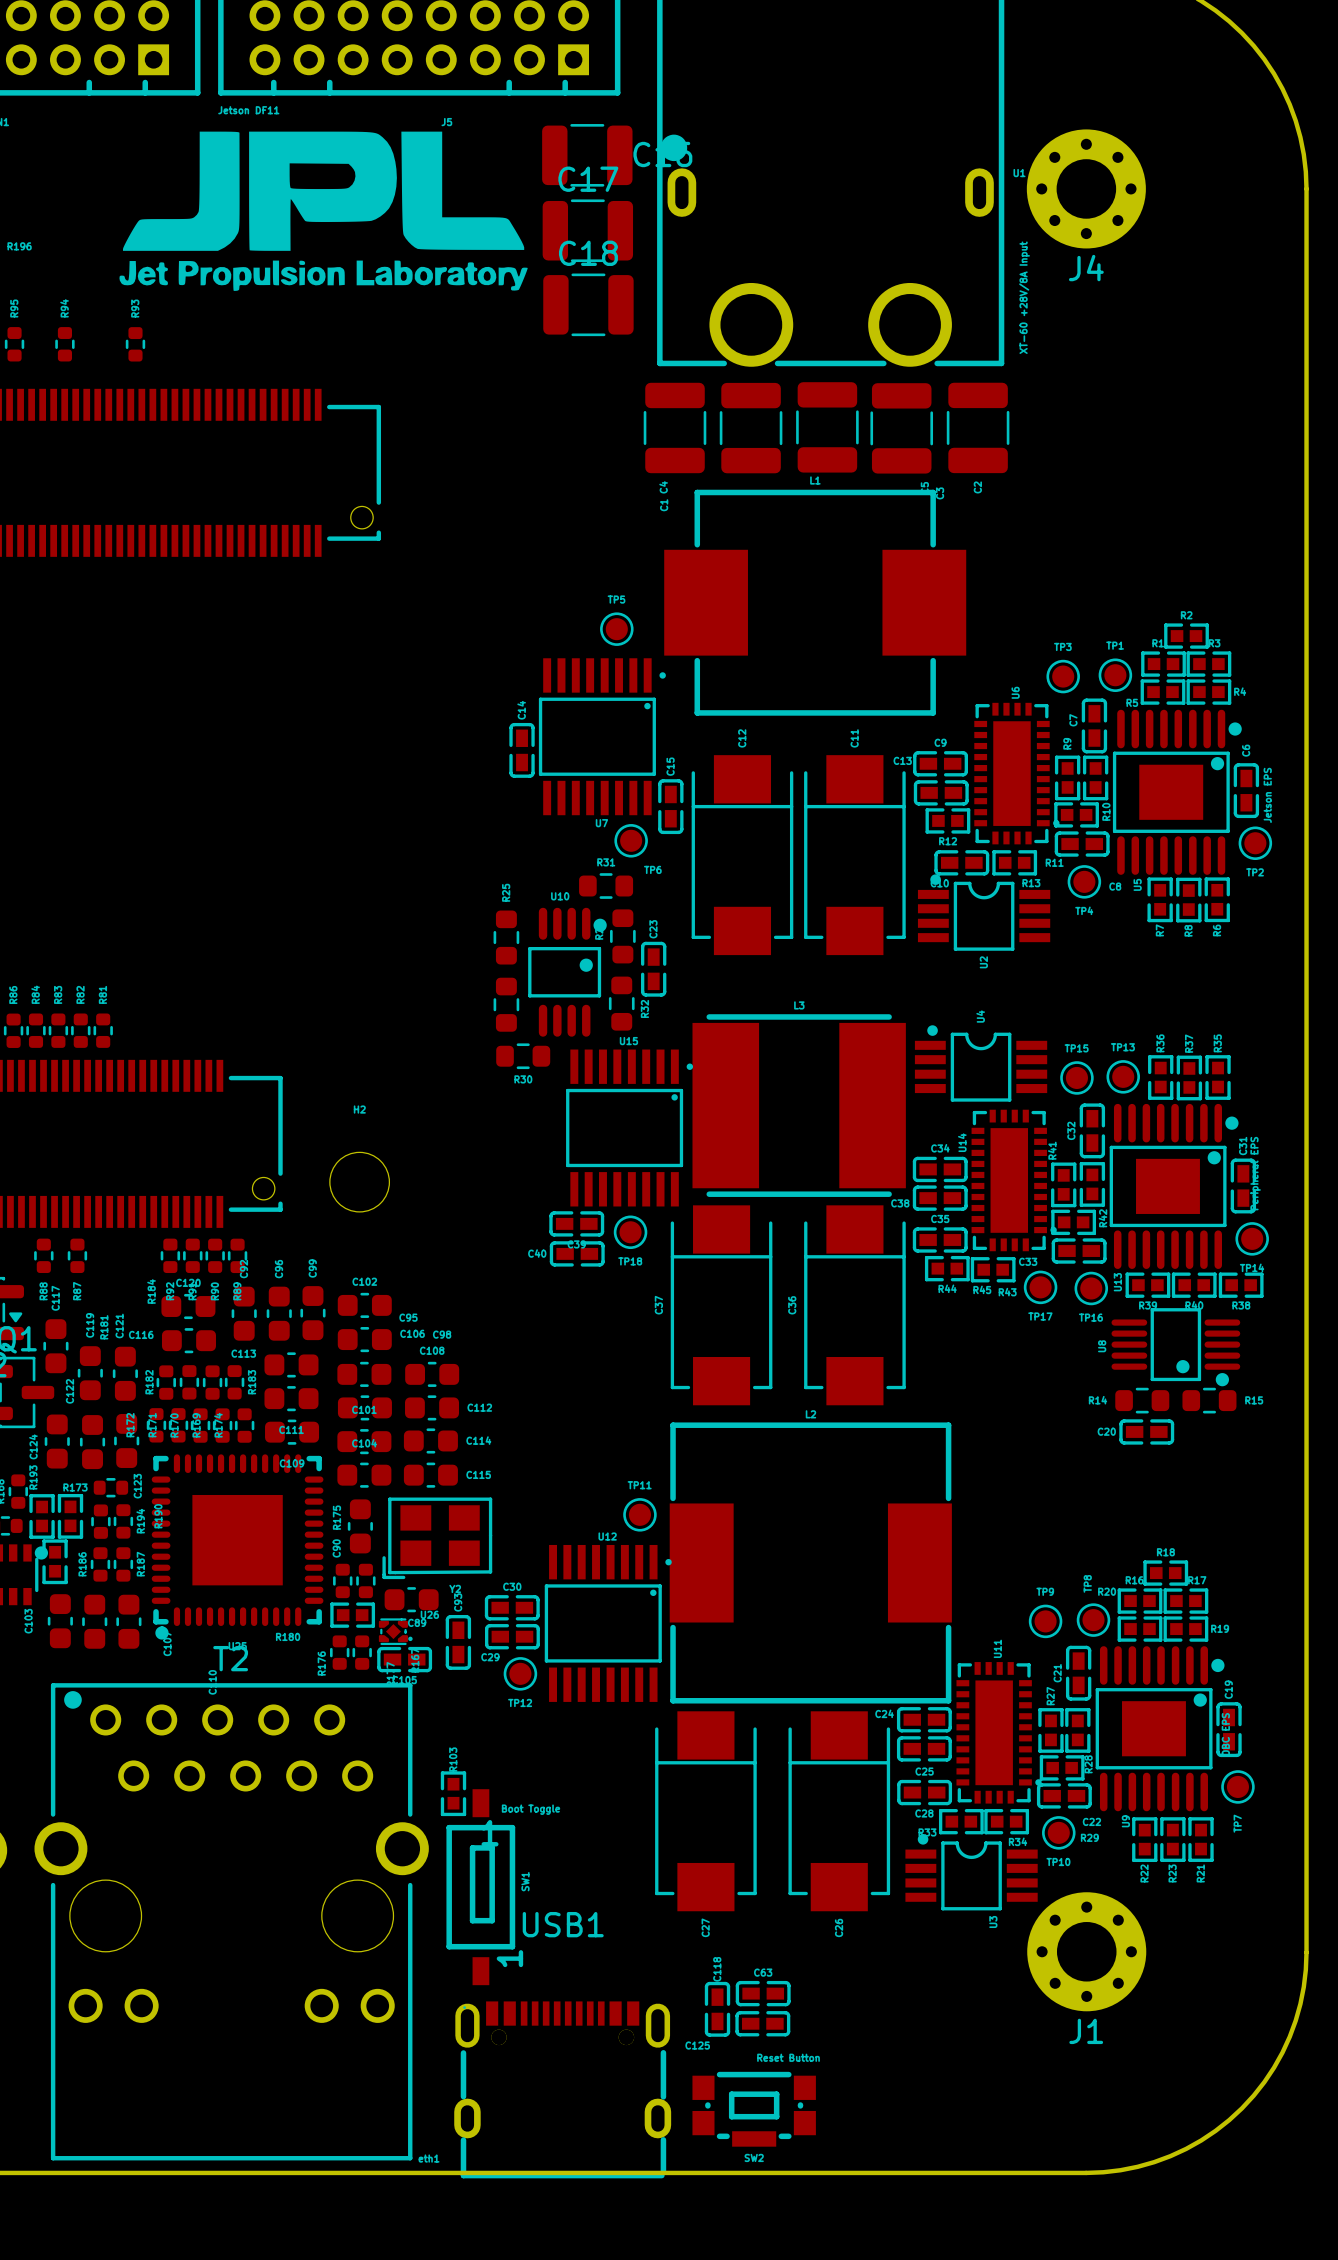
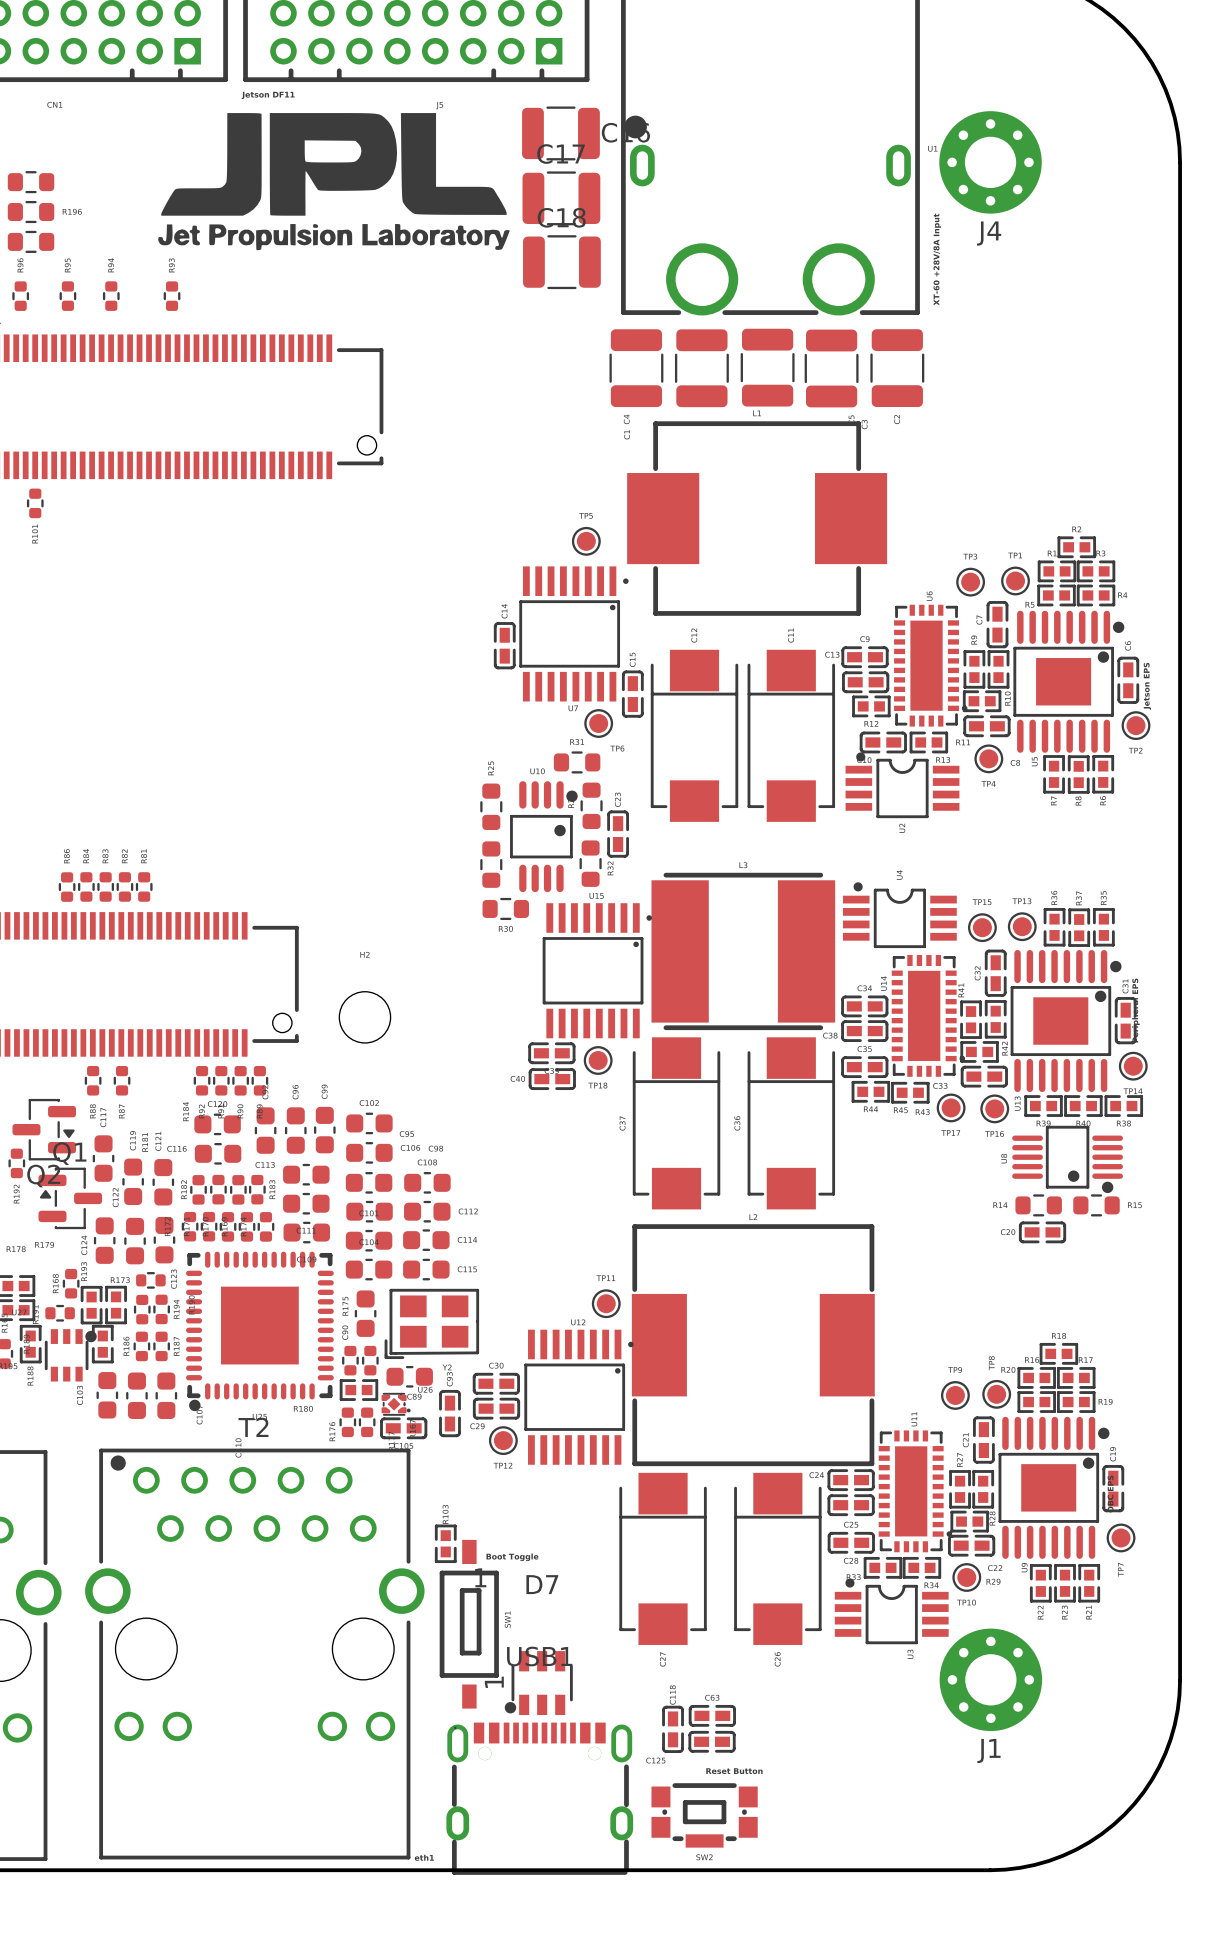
D7: none -> (538, 1683)

